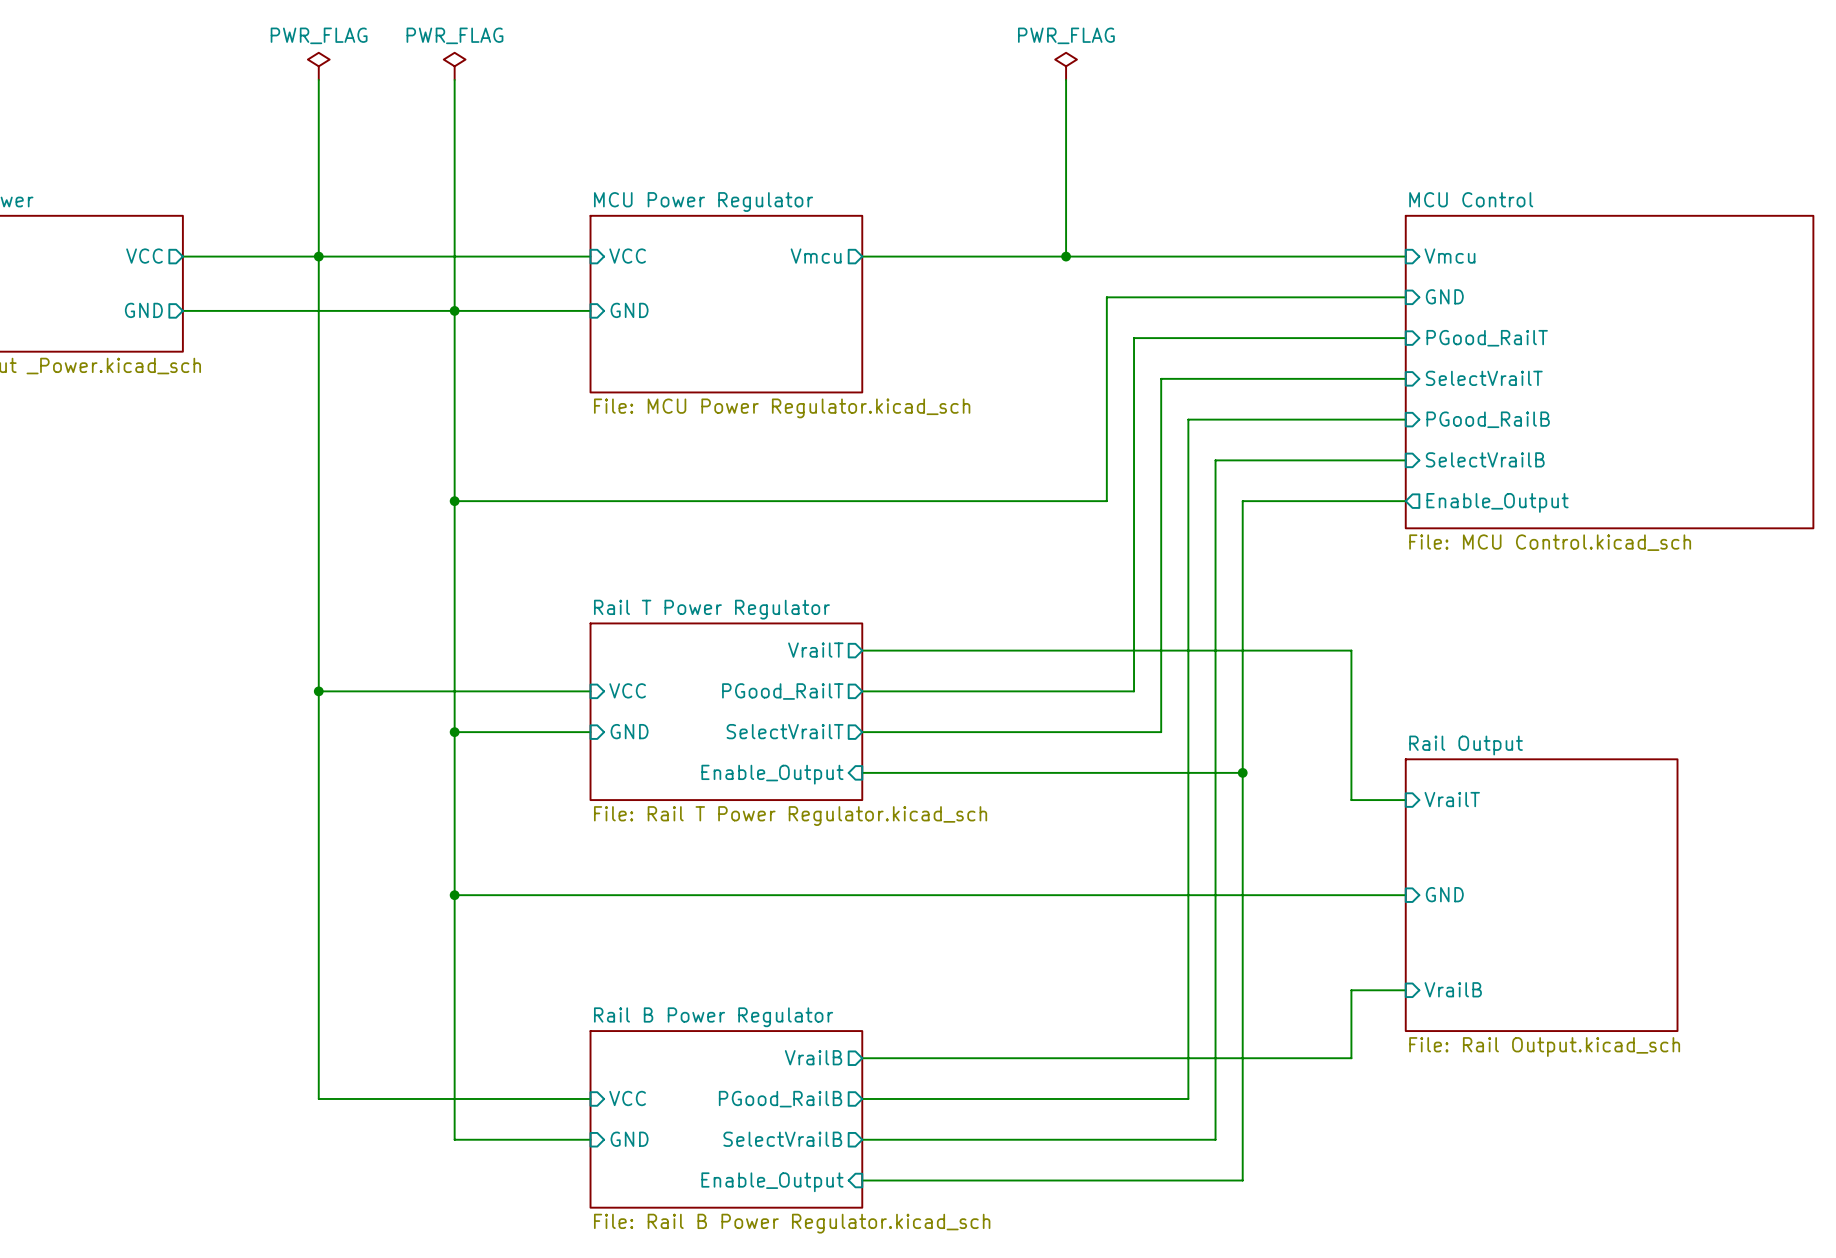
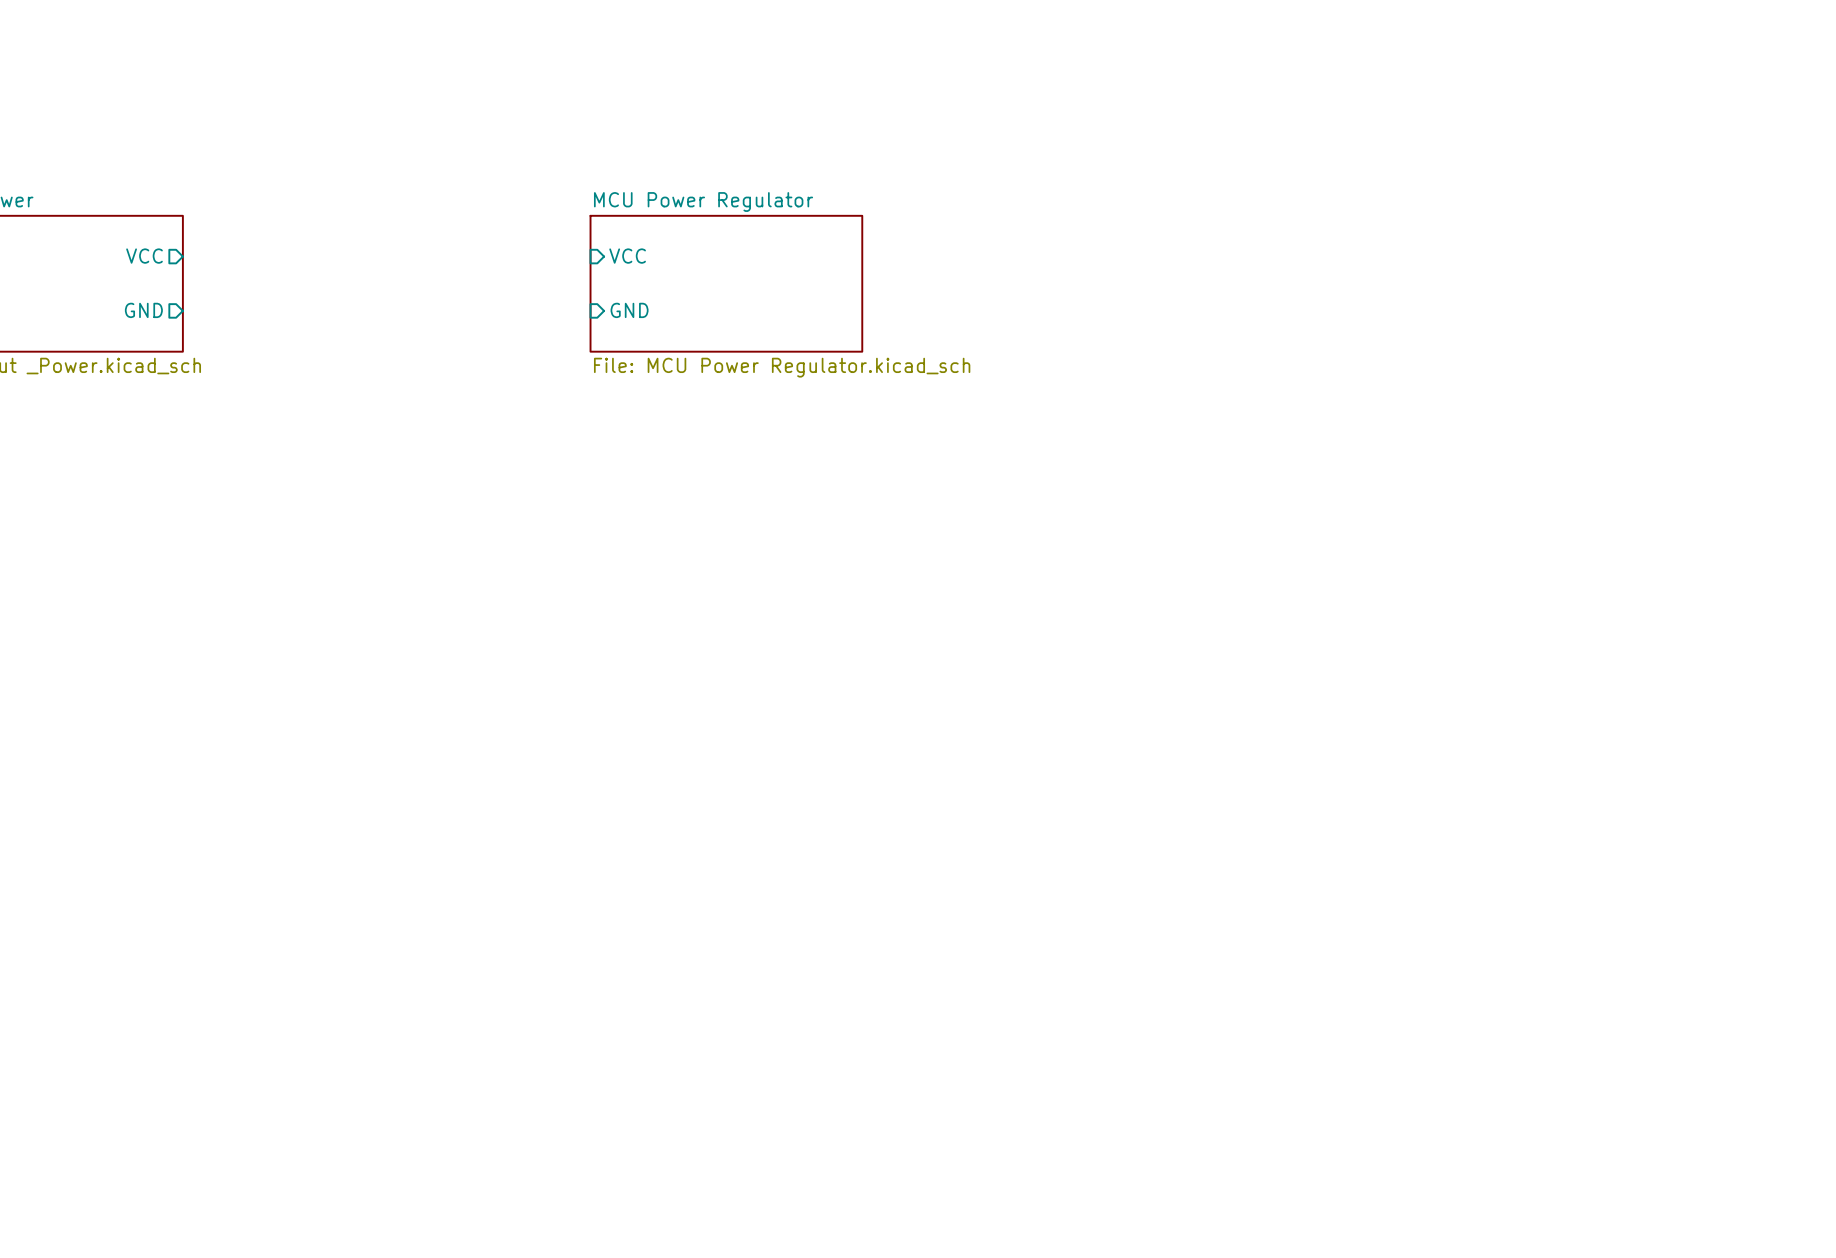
power symbol: PWR_FLAG (318, 66) -> none
power symbol: PWR_FLAG (454, 66) -> none
power symbol: PWR_FLAG (1066, 66) -> none
wire: (318, 79) (318, 1098) (590, 1098) -> none
wire: (454, 79) (454, 1139) (590, 1139) -> none
wire: (1066, 79) (1066, 256) -> none
wire: (182, 256) (590, 256) -> none
junction: (318, 256) -> none
sheet pin: Vmcu (816, 256) -> none
wire: (862, 256) (1405, 256) -> none
junction: (1066, 256) -> none
sheet pin: Vmcu (1449, 256) -> none
sheet MCU Power Regulator: none -> File: MCU Power Regulator.kicad_sch (726, 283)
sheet pin: GND (1444, 296) -> none
wire: (1405, 297) (1106, 297) (1106, 501) (454, 501) -> none
sheet MCU Power Regulator: File: MCU Power Regulator.kicad_sch (726, 304) -> none
wire: (182, 310) (590, 310) -> none
junction: (454, 310) -> none
wire: (1405, 338) (1134, 338) (1134, 691) (862, 691) -> none
sheet pin: PGood_RailT (1487, 338) -> none
sheet MCU Control: File: MCU Control.kicad_sch (1609, 372) -> none
wire: (1405, 378) (1161, 378) (1161, 732) (862, 732) -> none
sheet pin: SelectVrailT (1484, 378) -> none
wire: (1405, 419) (1188, 419) (1188, 1098) (862, 1098) -> none
sheet pin: PGood_RailB (1488, 419) -> none
sheet pin: SelectVrailB (1485, 459) -> none
wire: (1405, 460) (1215, 460) (1215, 1139) (862, 1139) -> none
junction: (454, 501) -> none
wire: (1405, 501) (1242, 501) (1242, 1180) (862, 1180) -> none
sheet pin: Enable_Output (1497, 502) -> none
sheet pin: VrailT (815, 650) -> none
wire: (862, 650) (1351, 650) (1351, 800) (1405, 800) -> none
sheet pin: VCC (627, 690) -> none
wire: (318, 691) (590, 691) -> none
junction: (318, 691) -> none
sheet pin: PGood_RailT (782, 691) -> none
sheet Rail T Power Regulator: File: Rail T Power Regulator.kicad_sch (726, 711) -> none
sheet pin: GND (629, 731) -> none
sheet pin: SelectVrailT (785, 731) -> none
wire: (454, 732) (590, 732) -> none
junction: (454, 732) -> none
wire: (862, 772) (1242, 772) -> none
junction: (1242, 772) -> none
sheet pin: Enable_Output (772, 774) -> none
sheet pin: VrailT (1452, 799) -> none
sheet pin: GND (1444, 894) -> none
wire: (454, 895) (1405, 895) -> none
junction: (454, 895) -> none
sheet Rail Output: File: Rail Output.kicad_sch (1541, 895) -> none
sheet pin: VrailB (1453, 989) -> none
wire: (1405, 990) (1351, 990) (1351, 1058) (862, 1058) -> none
sheet pin: VrailB (813, 1057) -> none
sheet pin: VCC (627, 1098) -> none
sheet pin: PGood_RailB (780, 1099) -> none
sheet Rail B Power Regulator: File: Rail B Power Regulator.kicad_sch (726, 1119) -> none
sheet pin: GND (629, 1139) -> none
sheet pin: SelectVrailB (782, 1139) -> none
sheet pin: Enable_Output (772, 1182) -> none

